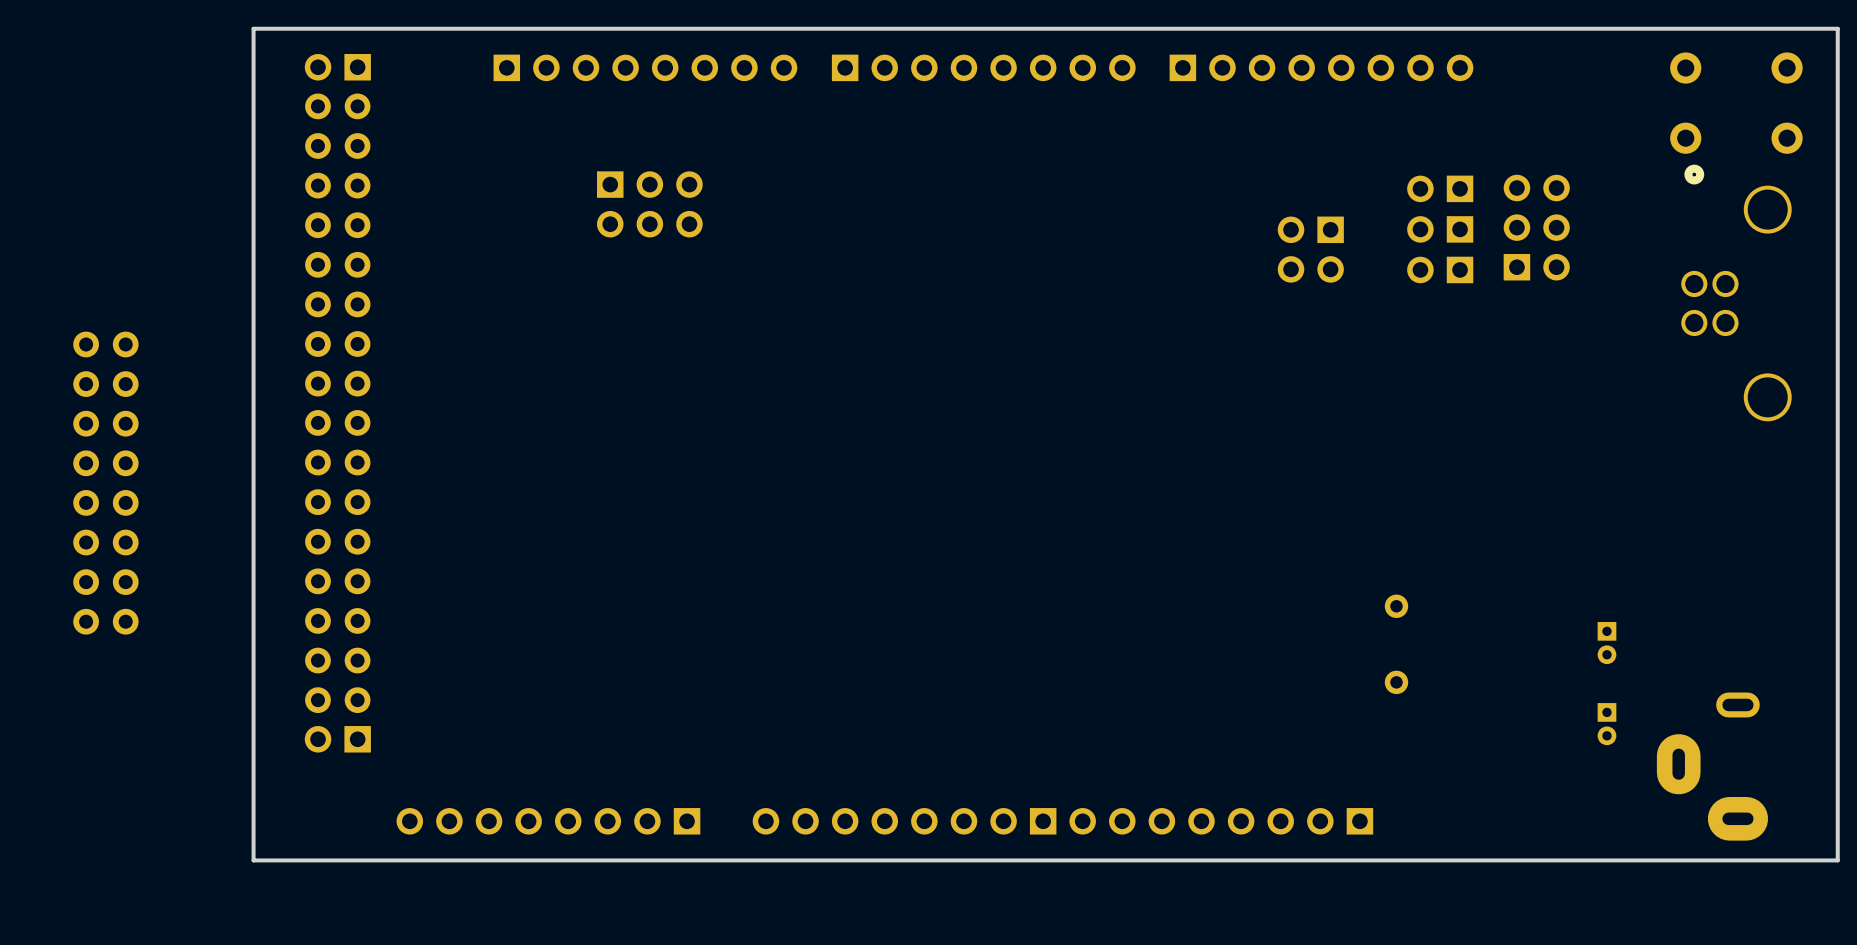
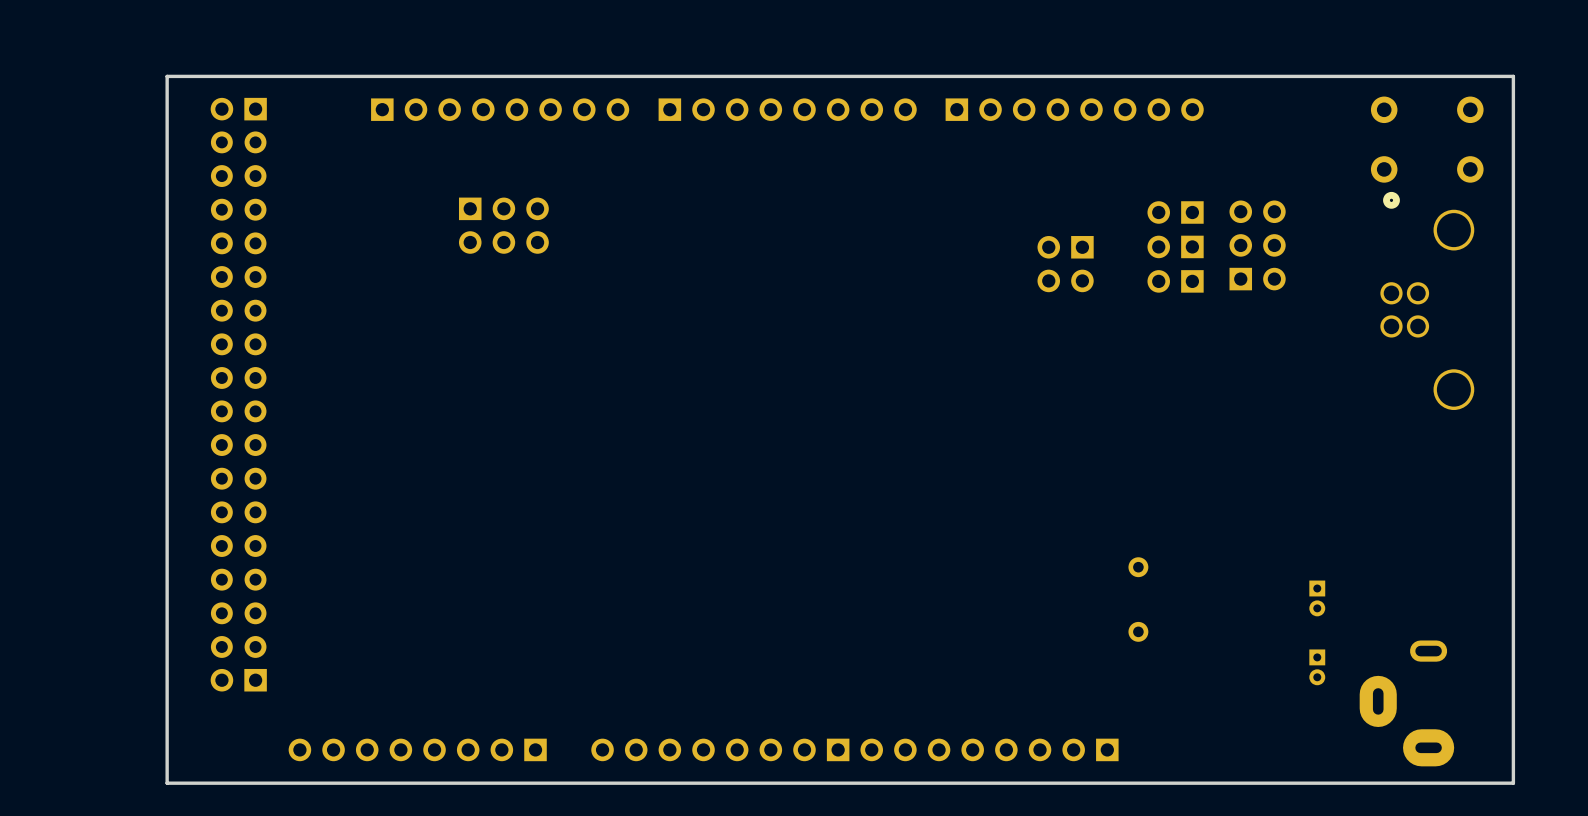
part: (105, 483) -> none

